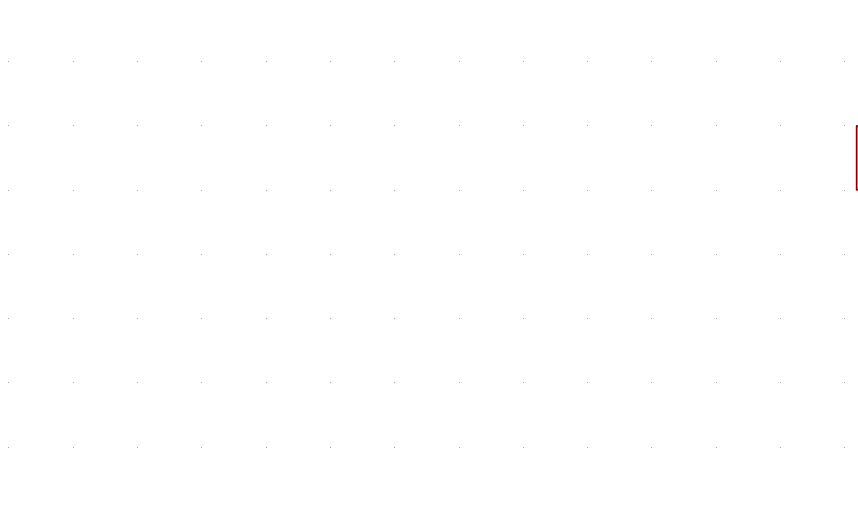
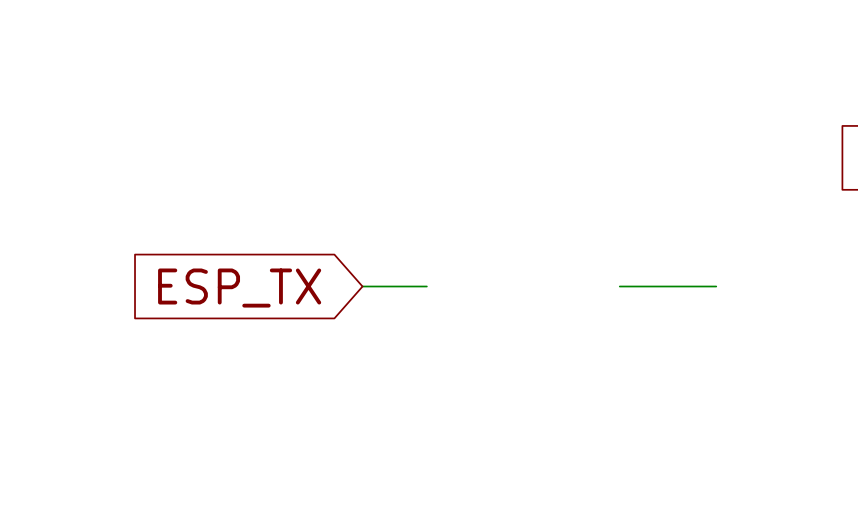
global label: none -> ESP_TX (239, 288)
wire: none -> (362, 286) (426, 286)
wire: none -> (619, 286) (716, 286)

